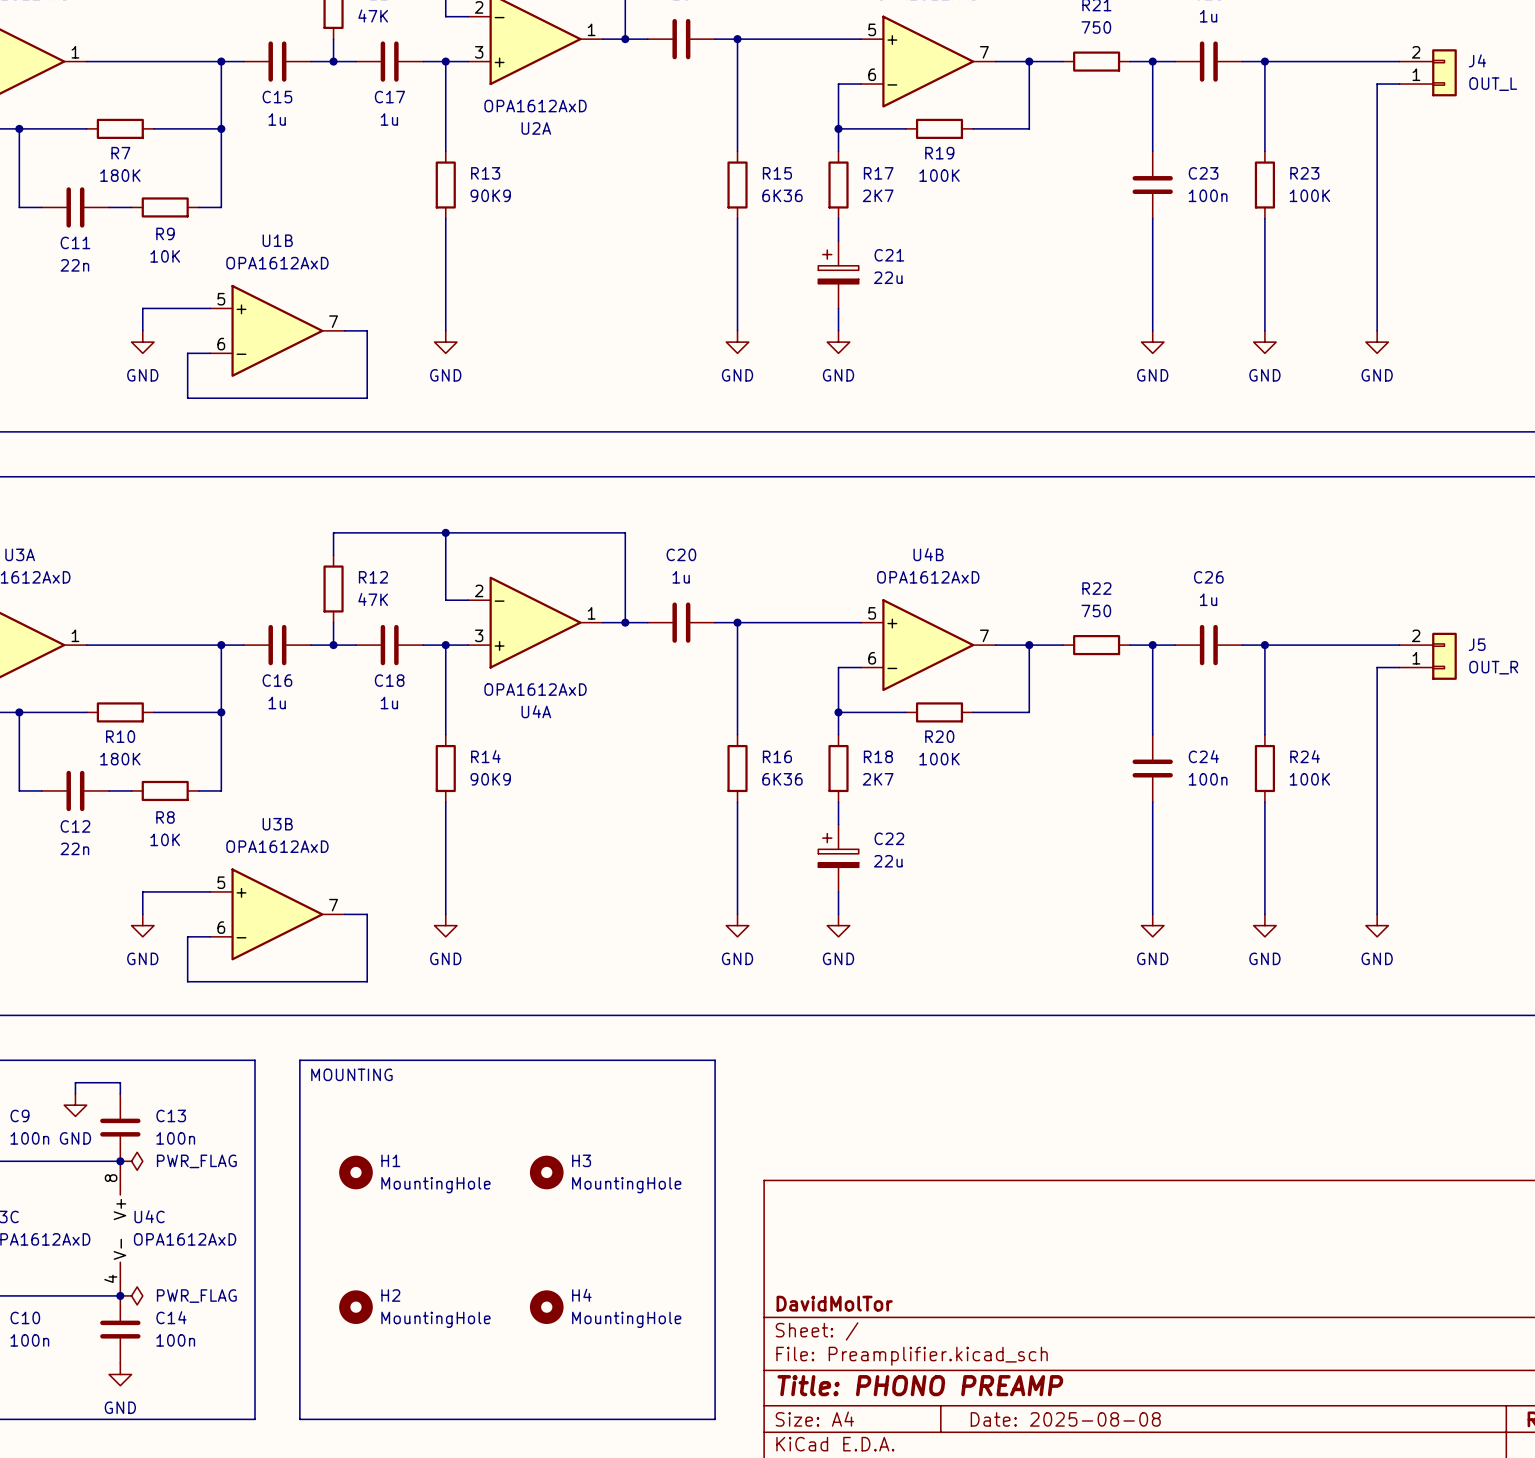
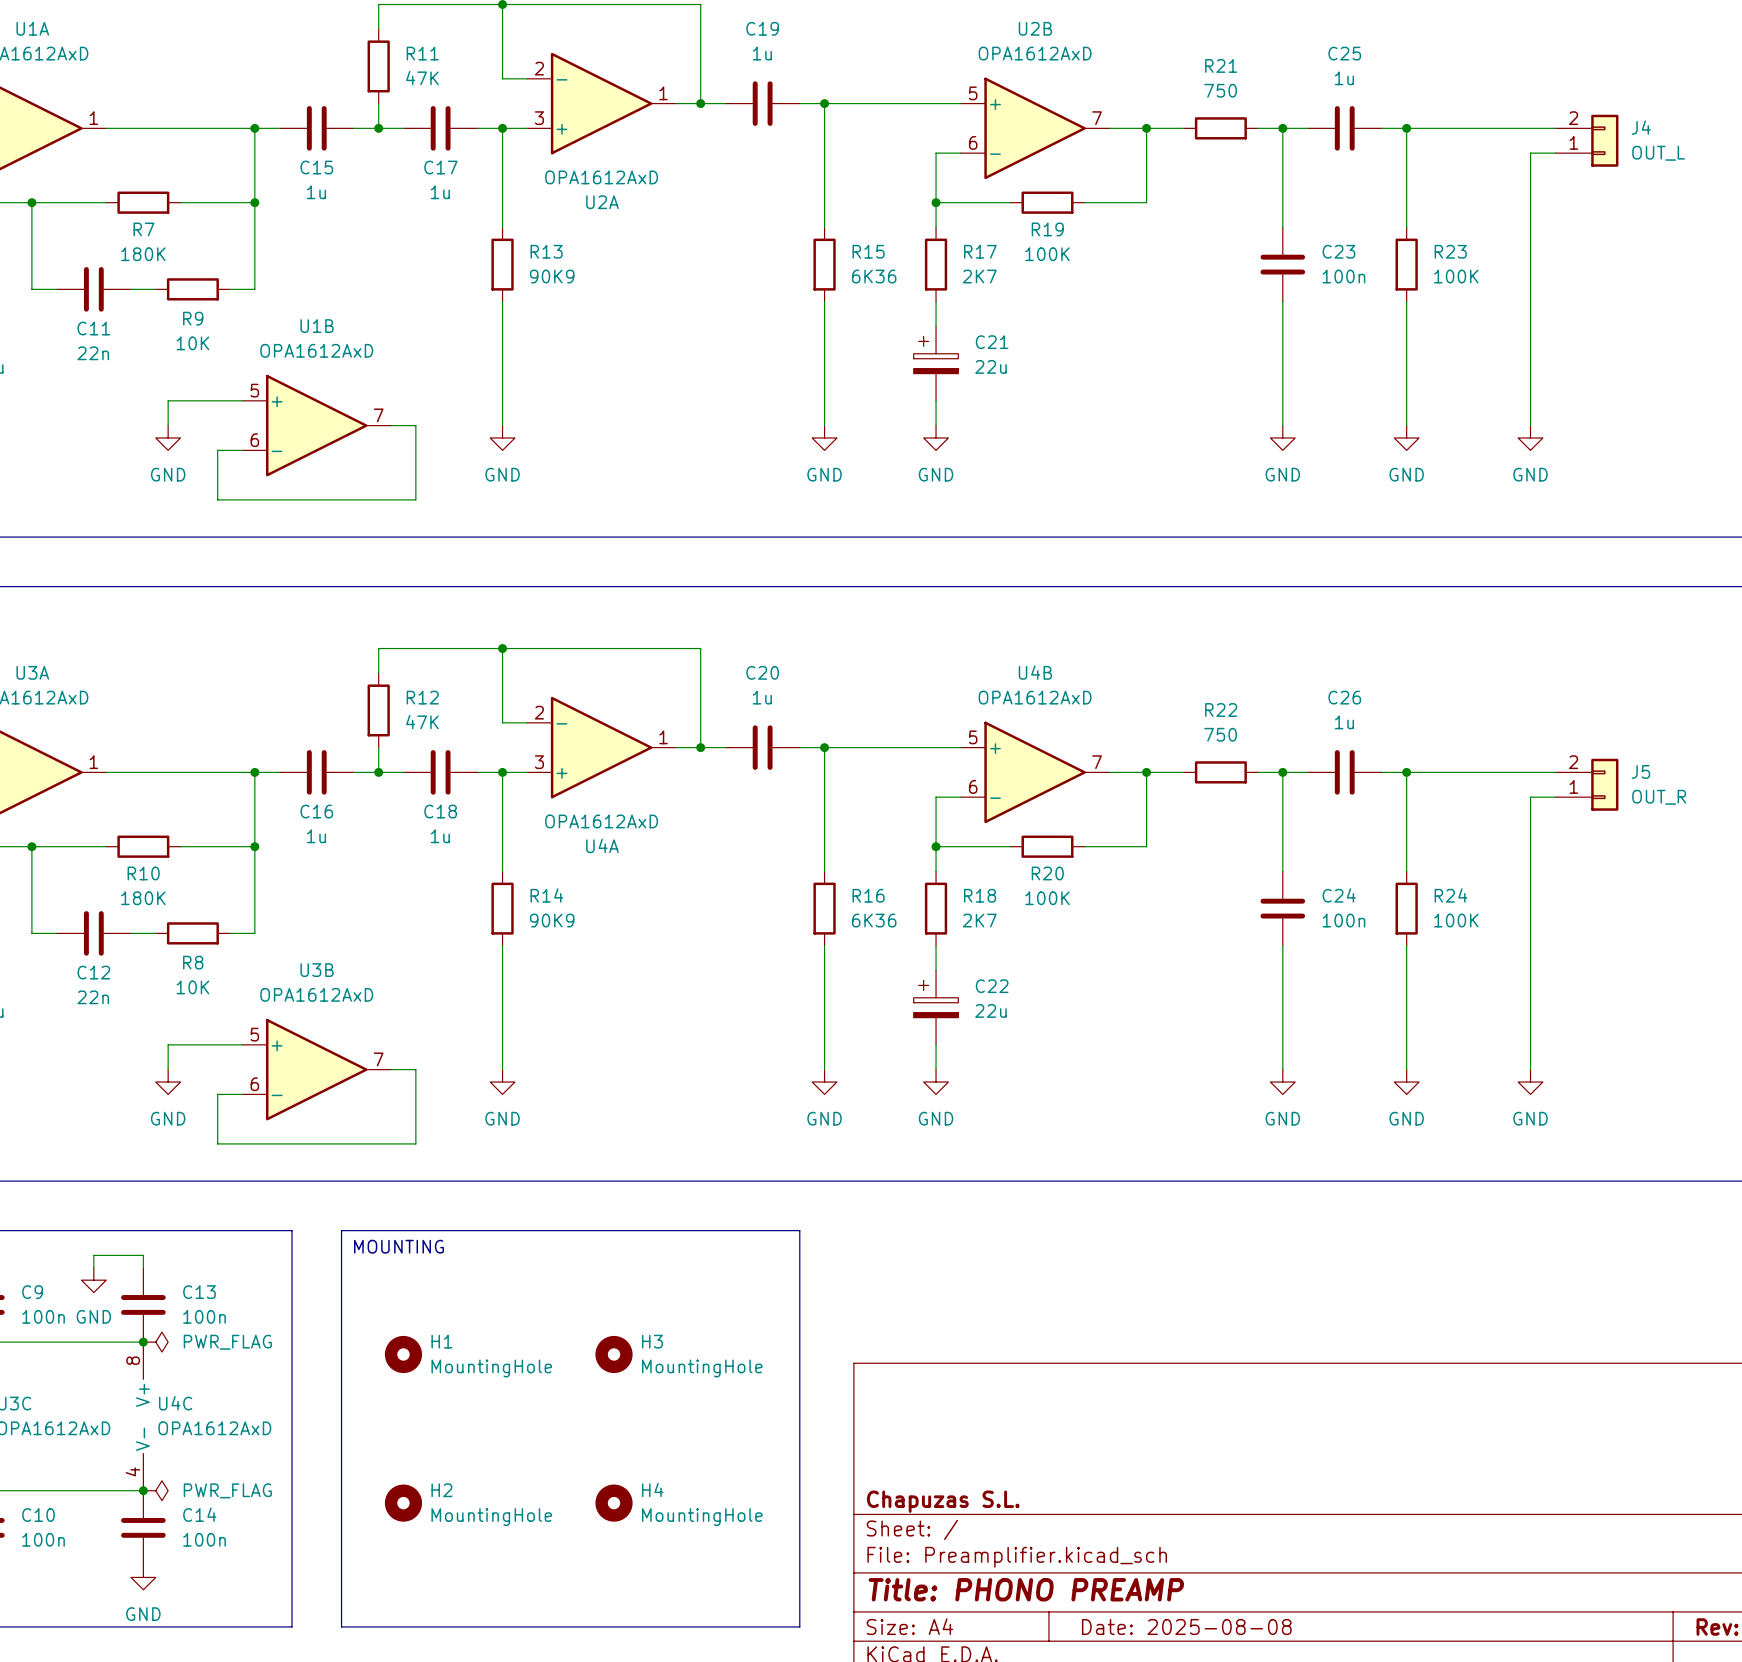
title block: DavidMolTor (834, 1303) -> Chapuzas S.L. (943, 1501)

